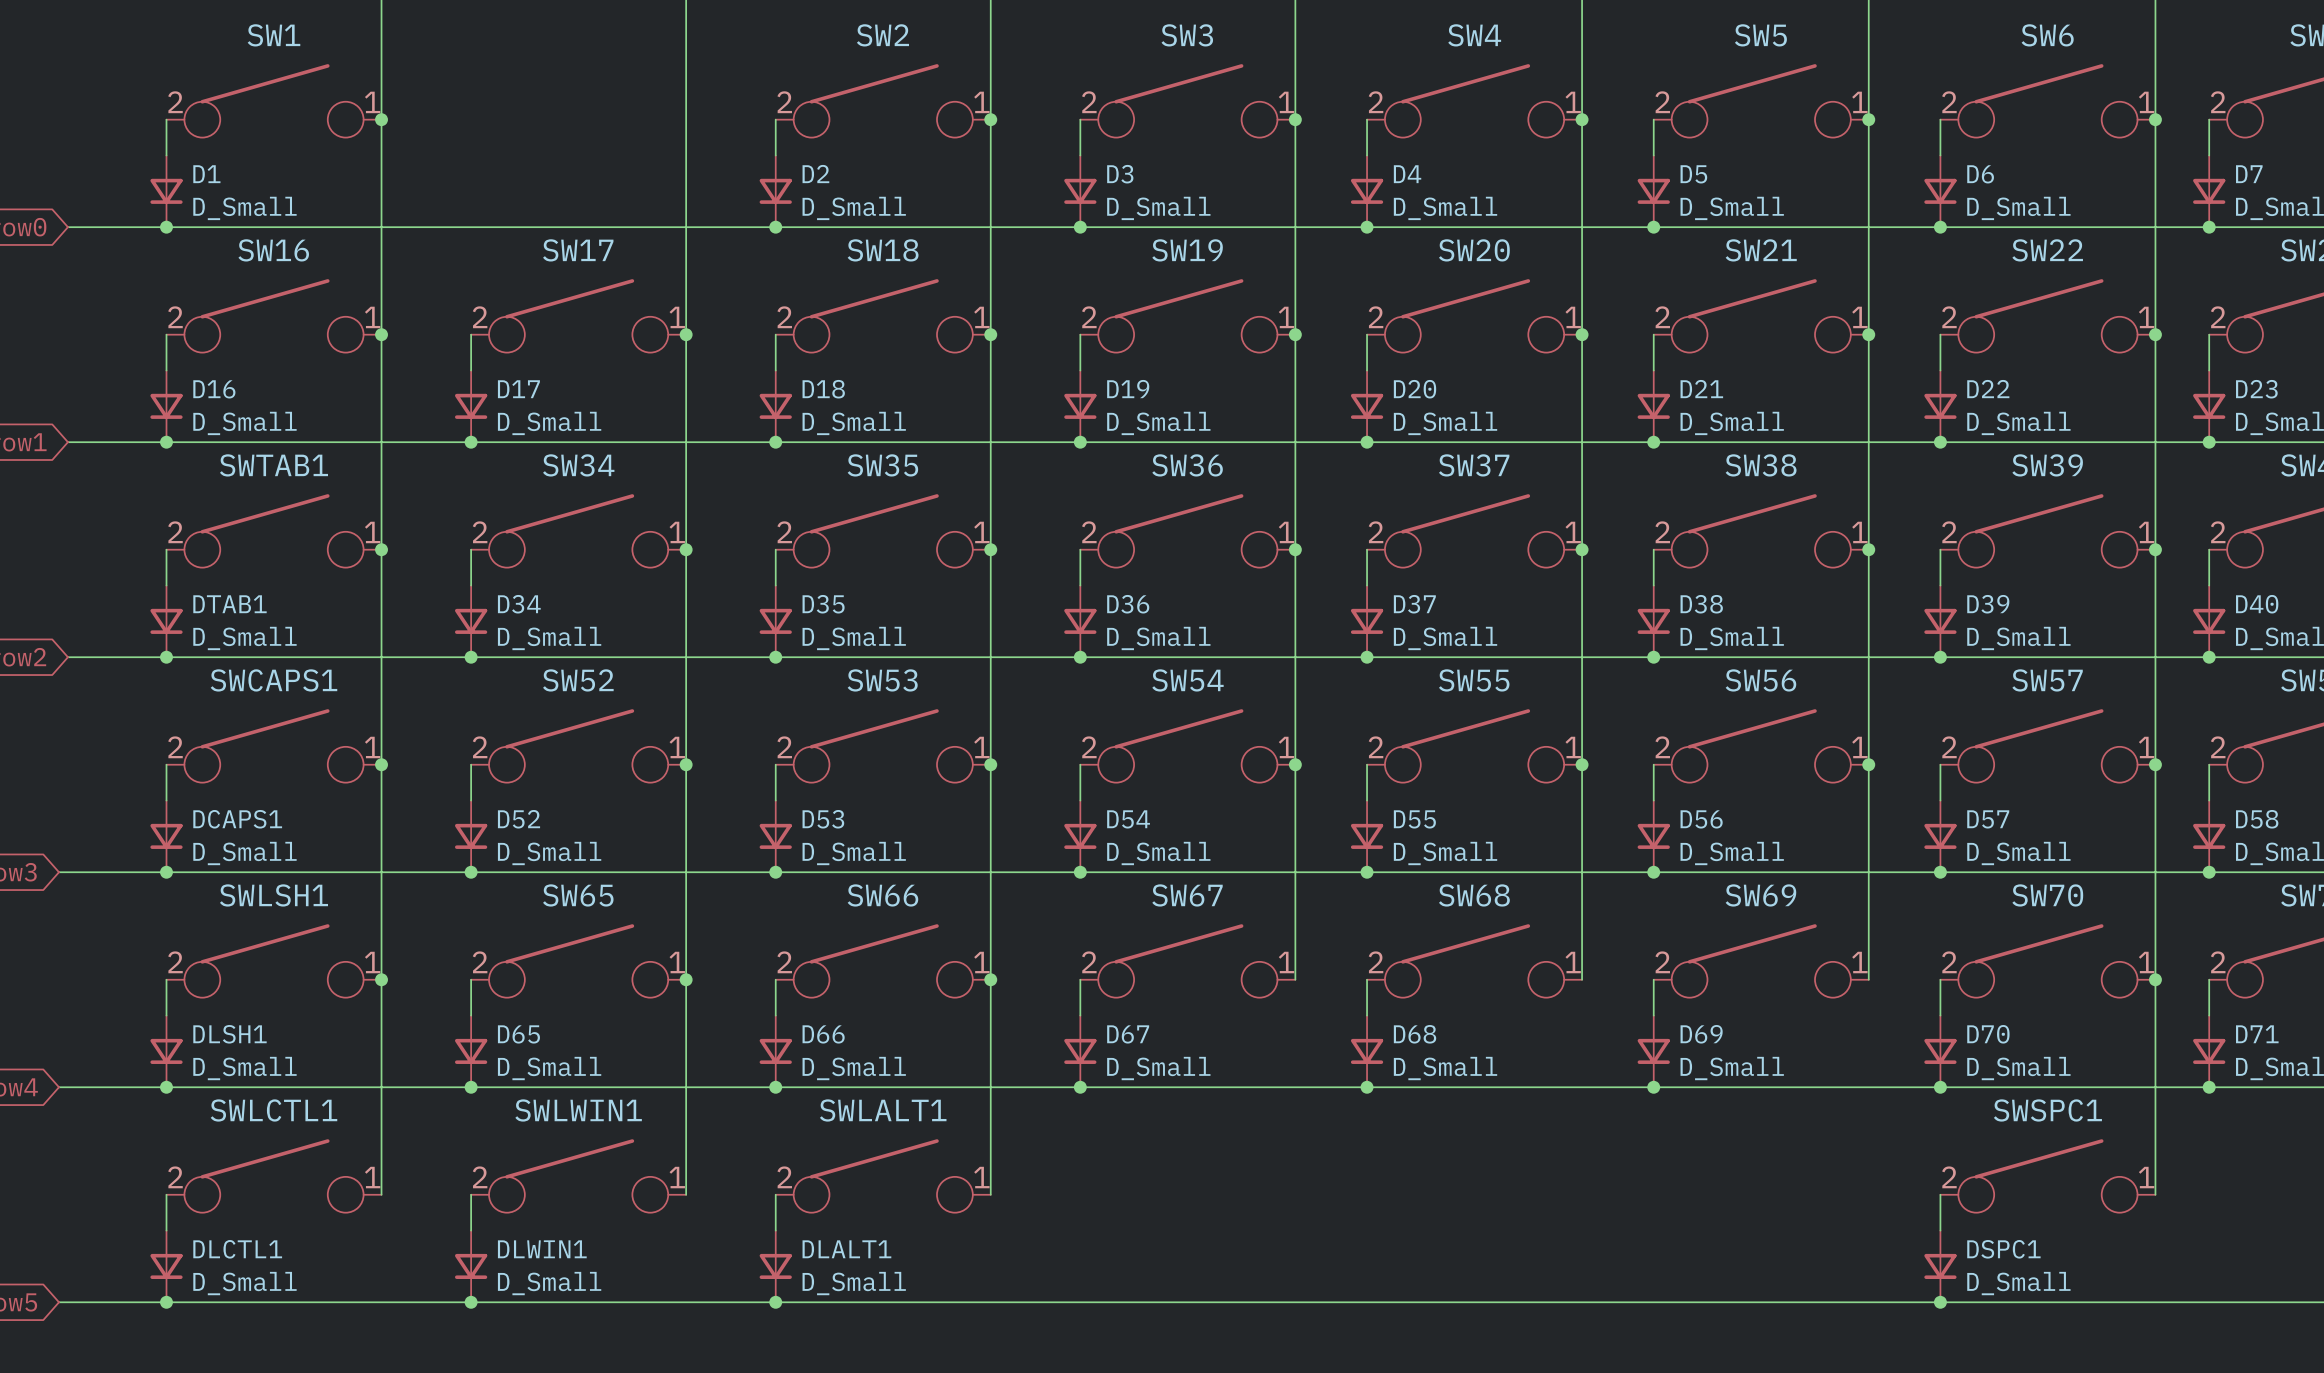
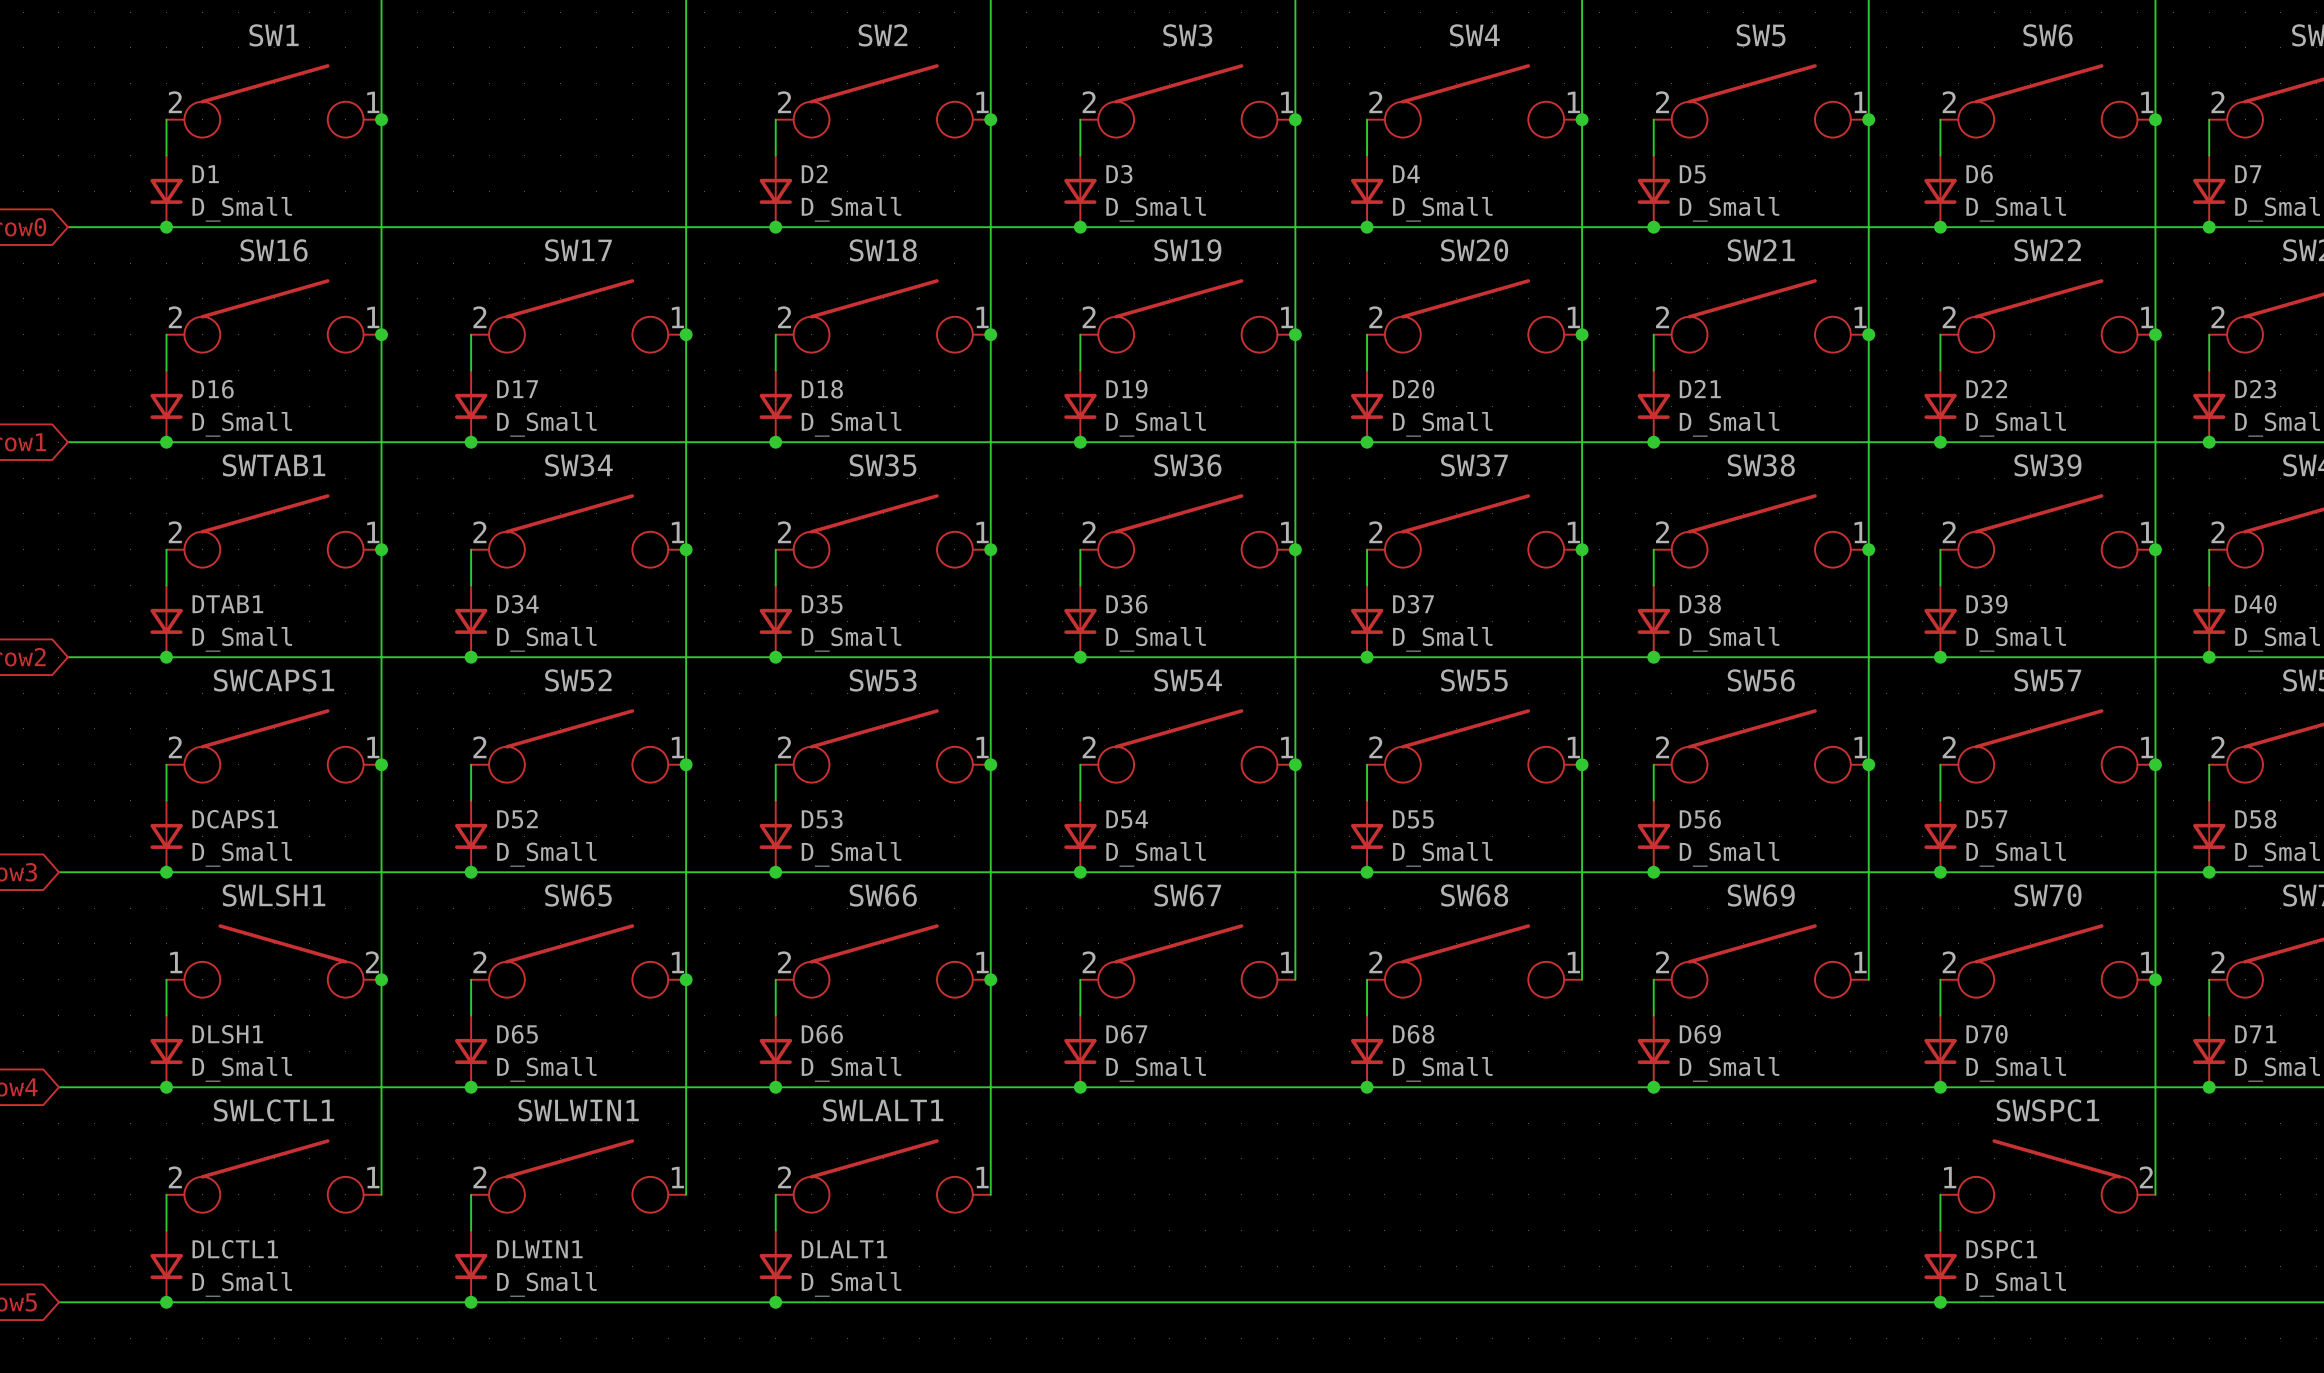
SWLSH1 flip: as is (274, 960) -> left-right (274, 960)
SWSPC1 flip: as is (2047, 1175) -> left-right (2047, 1175)

